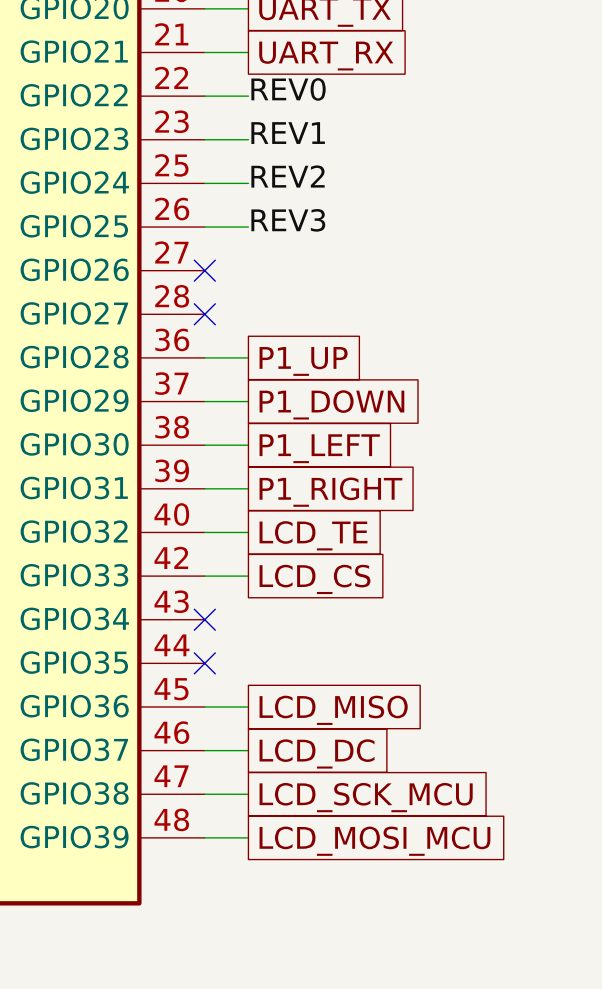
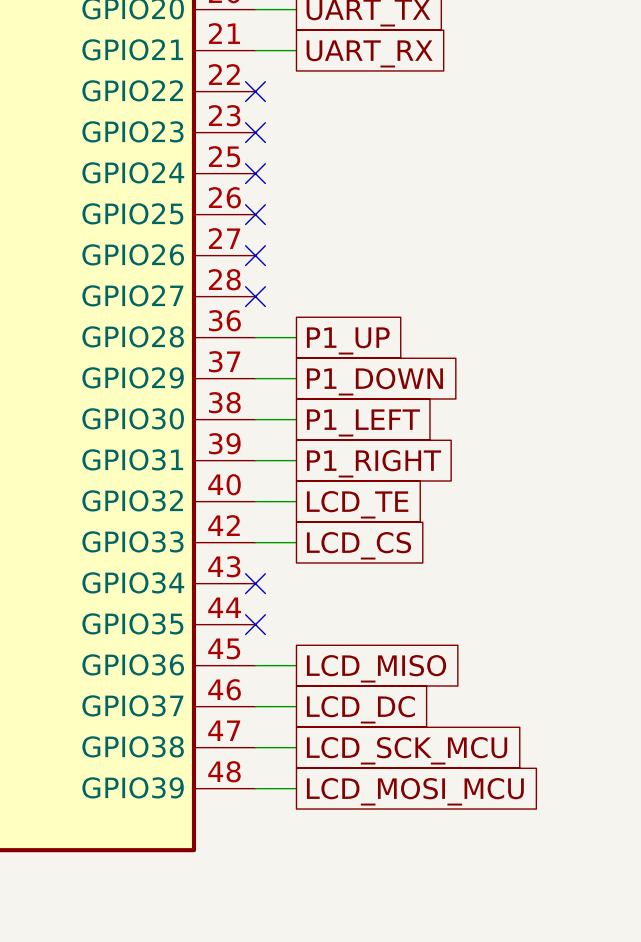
label: REV0 (288, 89) -> none
wire: (204, 96) (248, 96) -> none
no-connect mark: none -> (255, 91)
label: REV1 (288, 133) -> none
wire: (204, 139) (248, 139) -> none
no-connect mark: none -> (255, 132)
label: REV2 (288, 176) -> none
wire: (204, 183) (248, 183) -> none
no-connect mark: none -> (255, 173)
label: REV3 (288, 220) -> none
wire: (204, 227) (248, 227) -> none
no-connect mark: none -> (255, 214)

